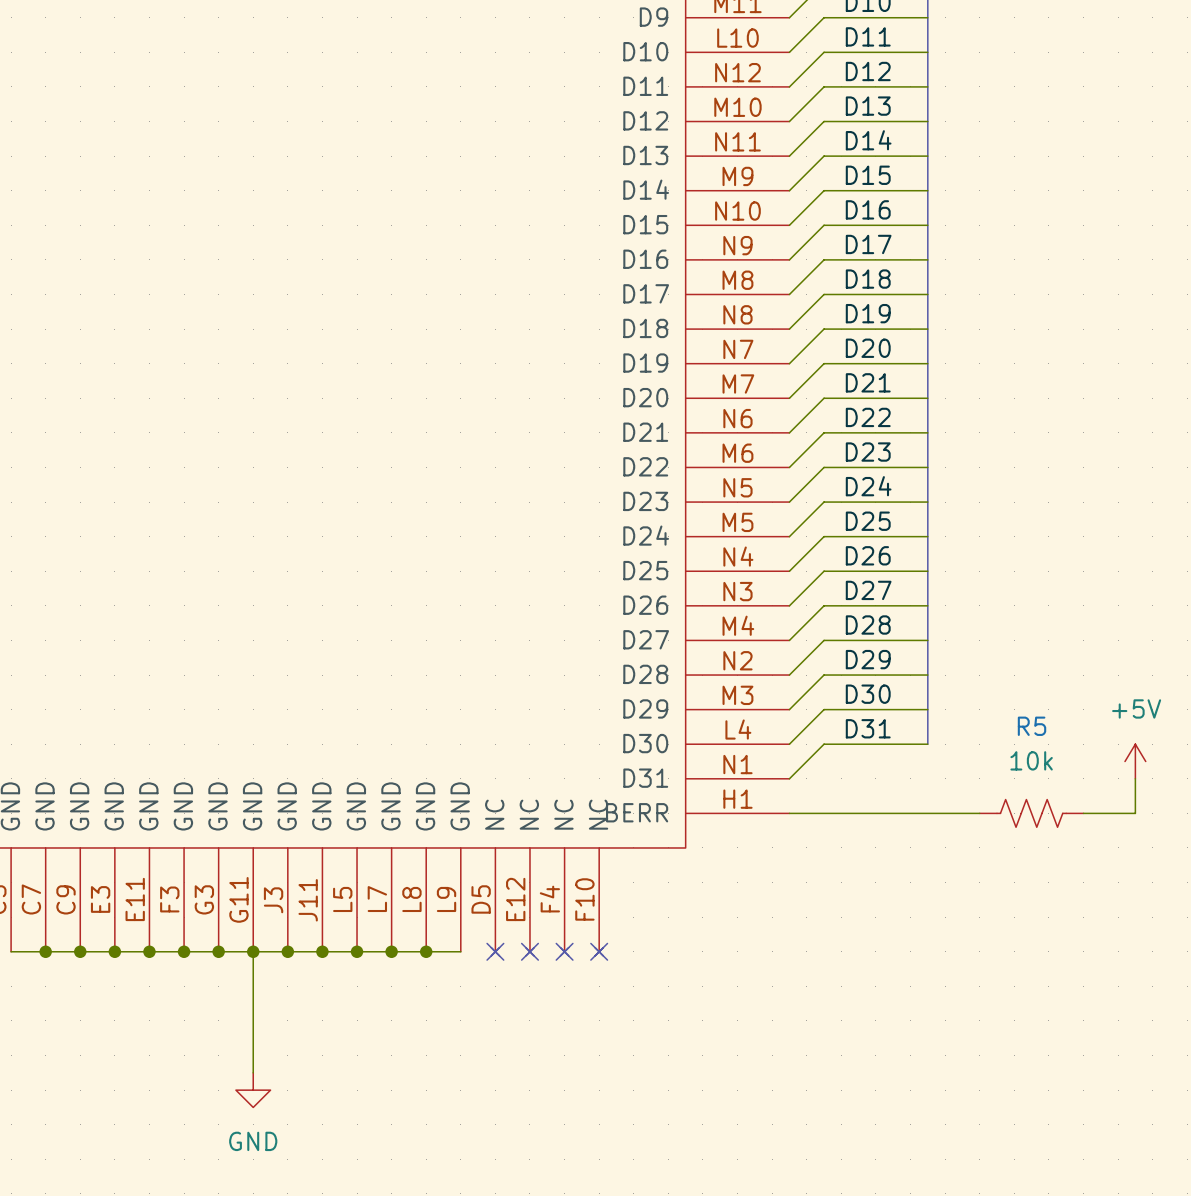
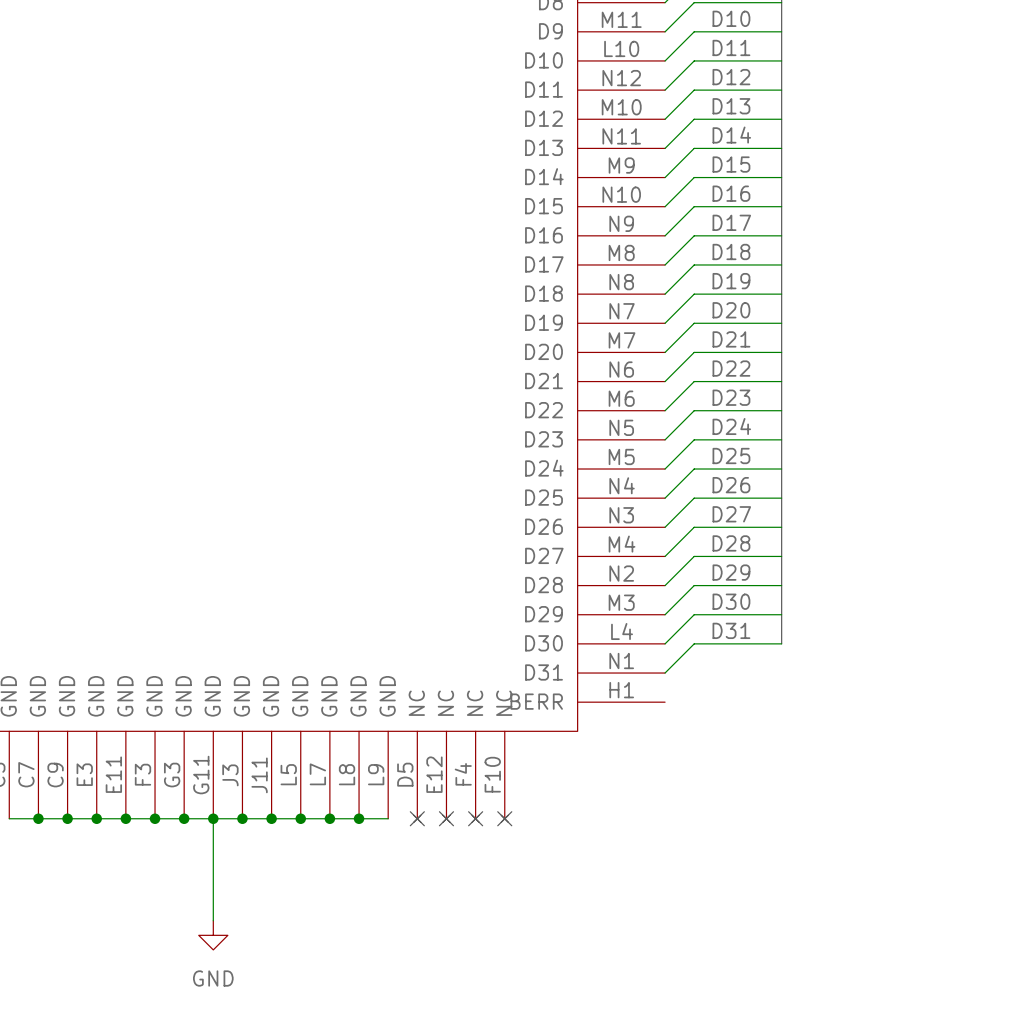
power symbol: +5V (1135, 761) -> none
wire: (1135, 778) (1135, 813) (1083, 813) -> none
wire: (789, 813) (979, 813) -> none
R5: 10k (1031, 813) -> none

